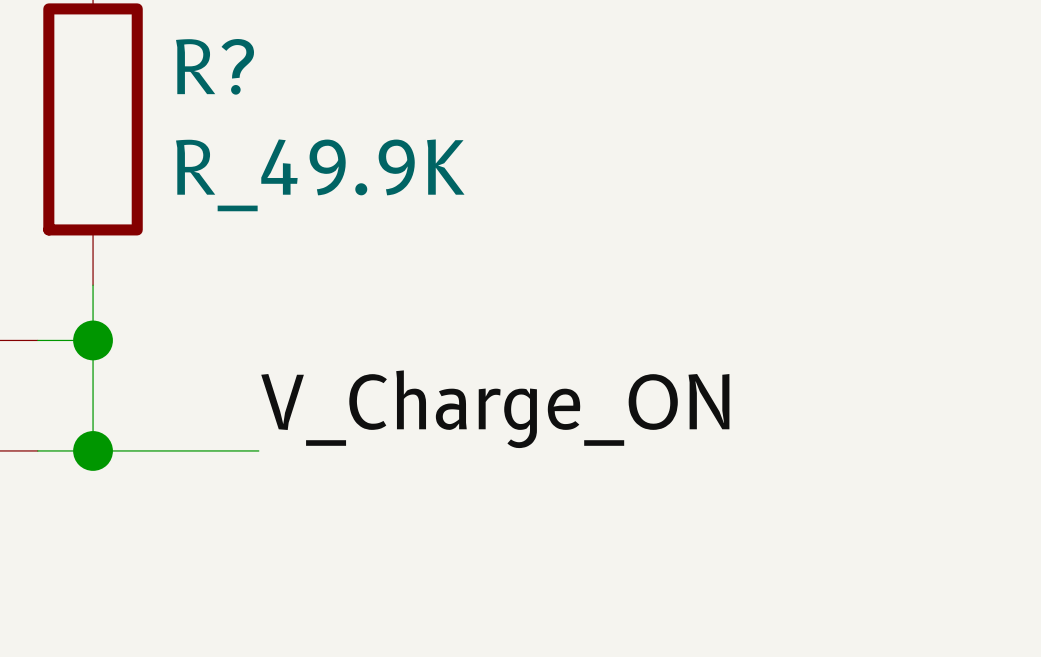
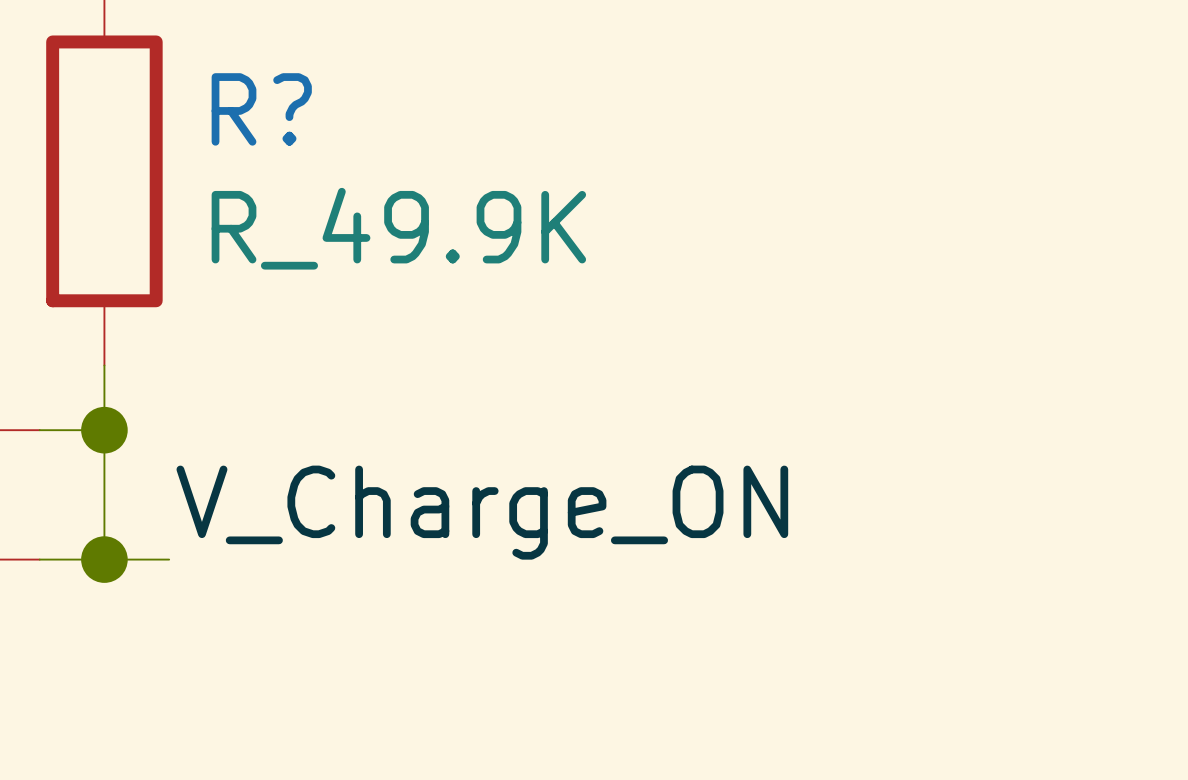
label position: V_Charge_ON (495, 409) -> V_Charge_ON (482, 512)
wire: (148, 450) (258, 450) -> none

